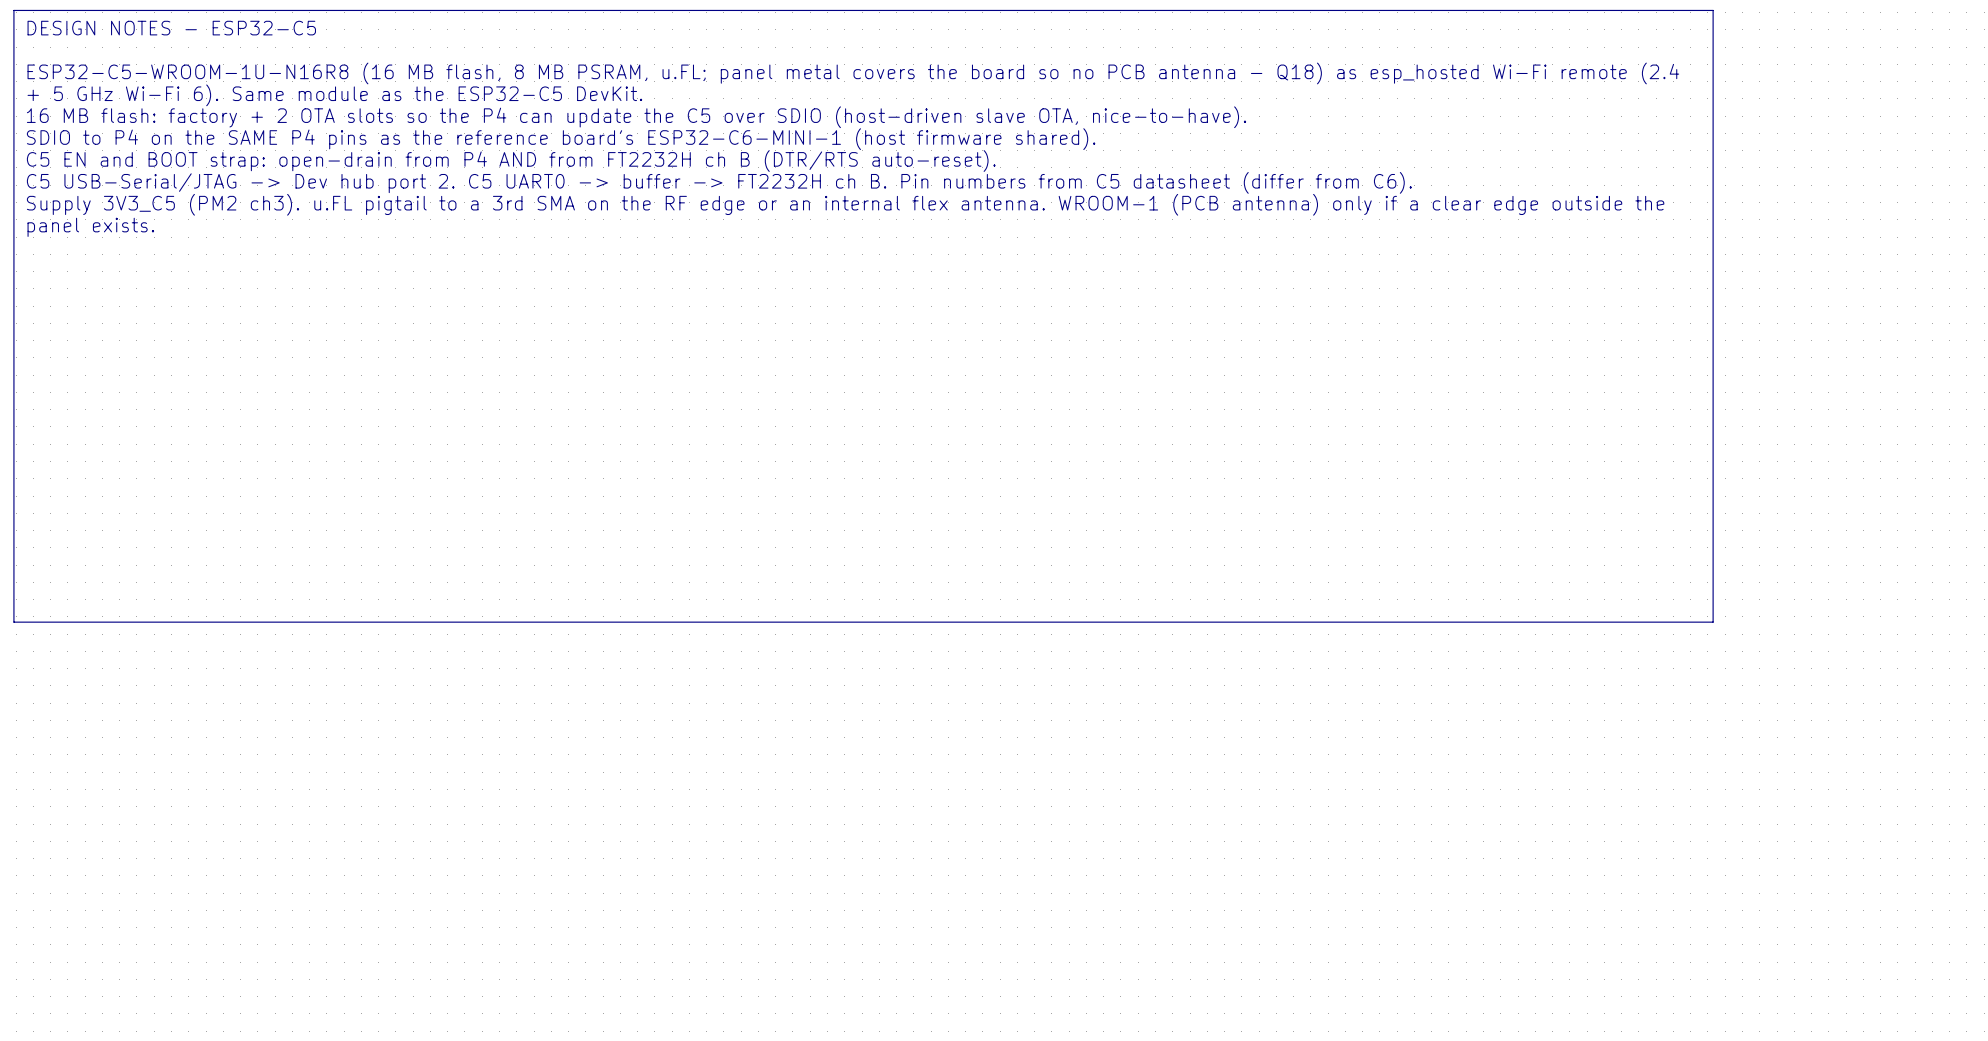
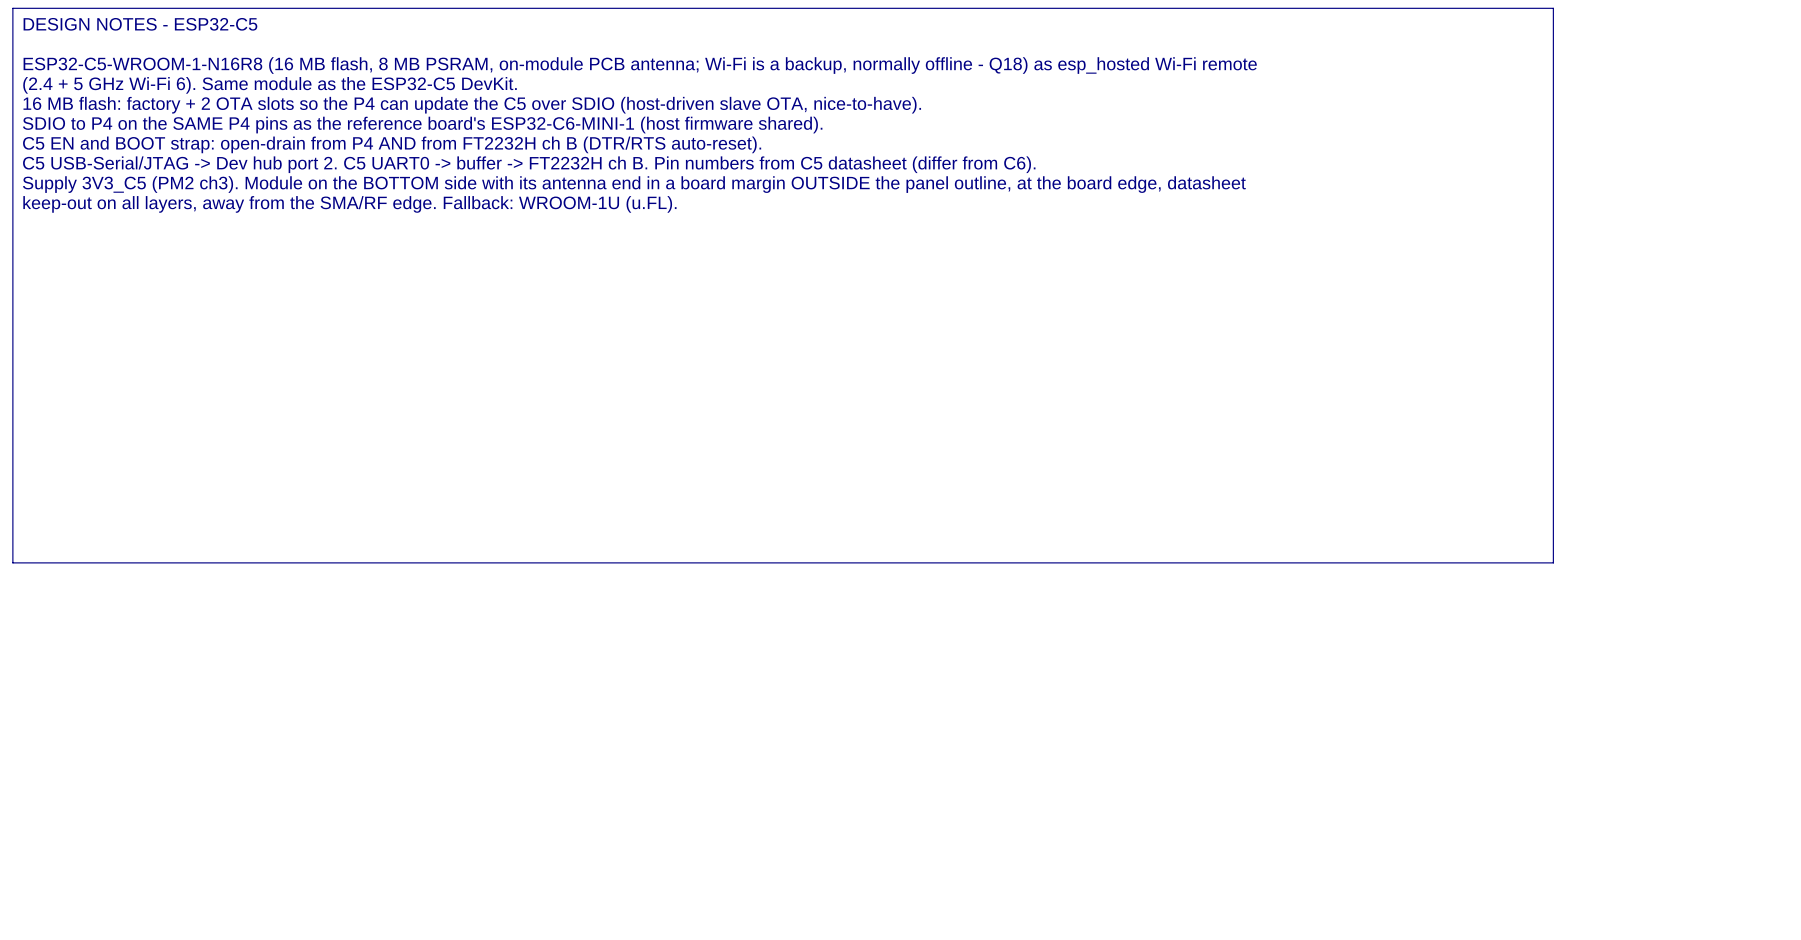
text: ESP32-C5-WROOM-1U-N16R8 (16 MB flash, 8 MB PSRAM, u.FL; panel metal covers the board so no PCB antenna - Q18) as esp_hosted Wi-Fi remote (2.4 (853, 73) -> ESP32-C5-WROOM-1-N16R8 (16 MB flash, 8 MB PSRAM, on-module PCB antenna; Wi-Fi is a backup, normally offline - Q18) as esp_hosted Wi-Fi remote (640, 65)
text: + 5 GHz Wi-Fi 6). Same module as the ESP32-C5 DevKit. (334, 95) -> (2.4 + 5 GHz Wi-Fi 6). Same module as the ESP32-C5 DevKit. (270, 85)
text: Supply 3V3_C5 (PM2 ch3). u.FL pigtail to a 3rd SMA on the RF edge or an internal flex antenna. WROOM-1 (PCB antenna) only if a clear edge outside the (845, 204) -> Supply 3V3_C5 (PM2 ch3). Module on the BOTTOM side with its antenna end in a board margin OUTSIDE the panel outline, at the board edge, datasheet (634, 184)
text: panel exists. (90, 227) -> keep-out on all layers, away from the SMA/RF edge. Fallback: WROOM-1U (u.FL). (349, 204)

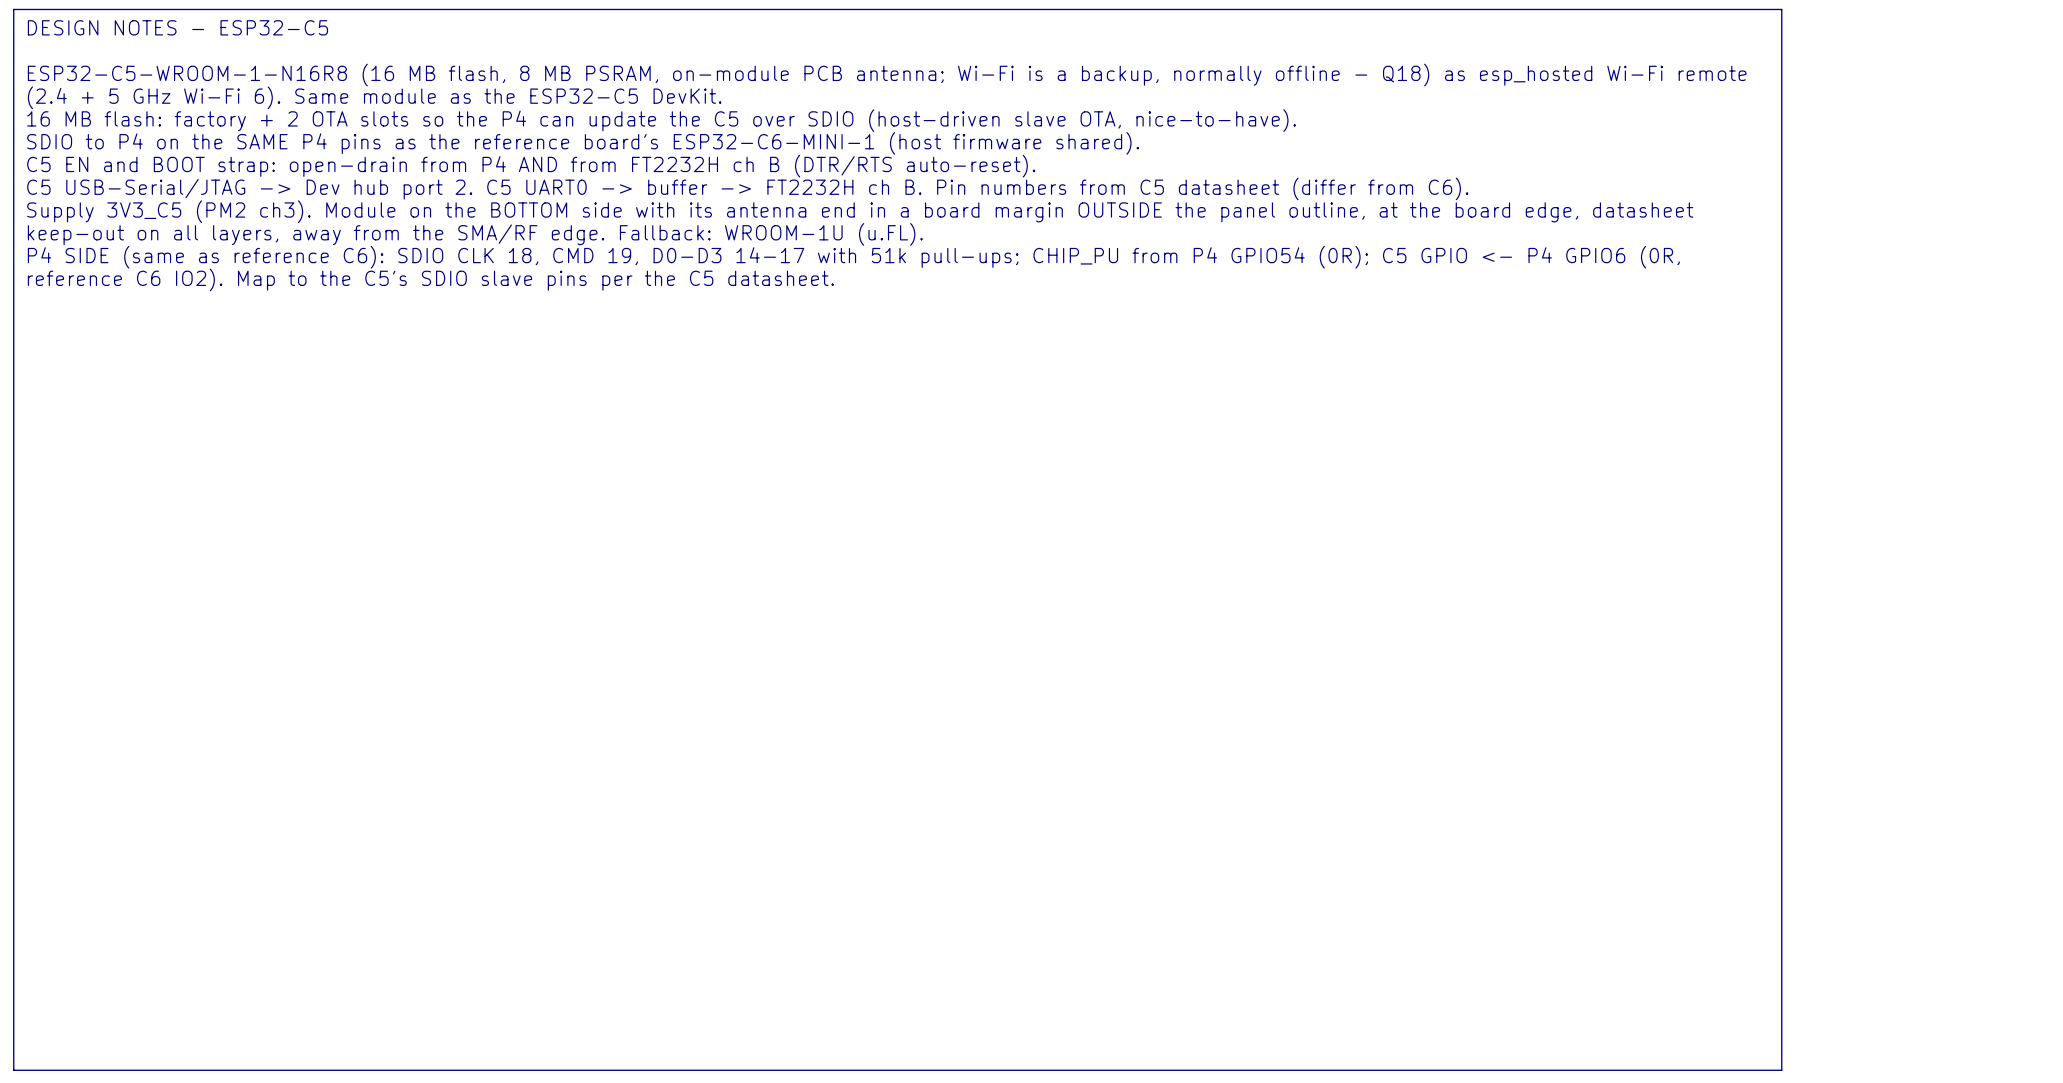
text: none -> P4 SIDE (same as reference C6): SDIO CLK 18, CMD 19, D0-D3 14-17 with 51k pull-ups; CHIP_PU from P4 GPIO54 (0R); C5 GPIO <- P4 GPIO6 (0R, (853, 257)
text: none -> reference C6 IO2). Map to the C5's SDIO slave pins per the C5 datasheet. (430, 280)
line: (12, 562) (1553, 562) -> (13, 645) (13, 1070) (1781, 1070) (1781, 645)

